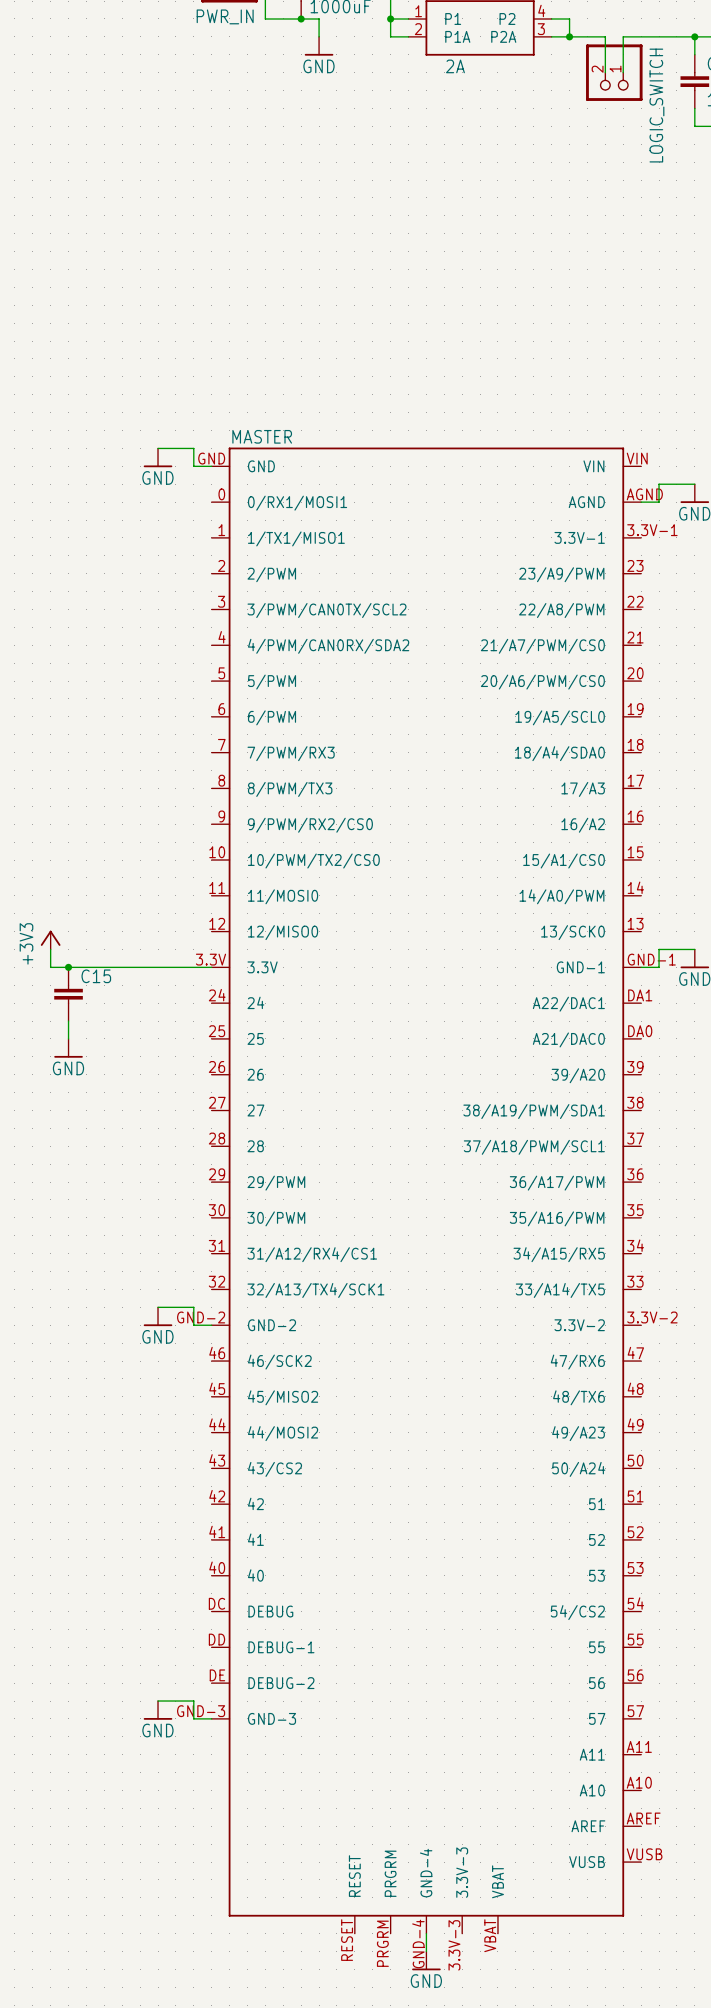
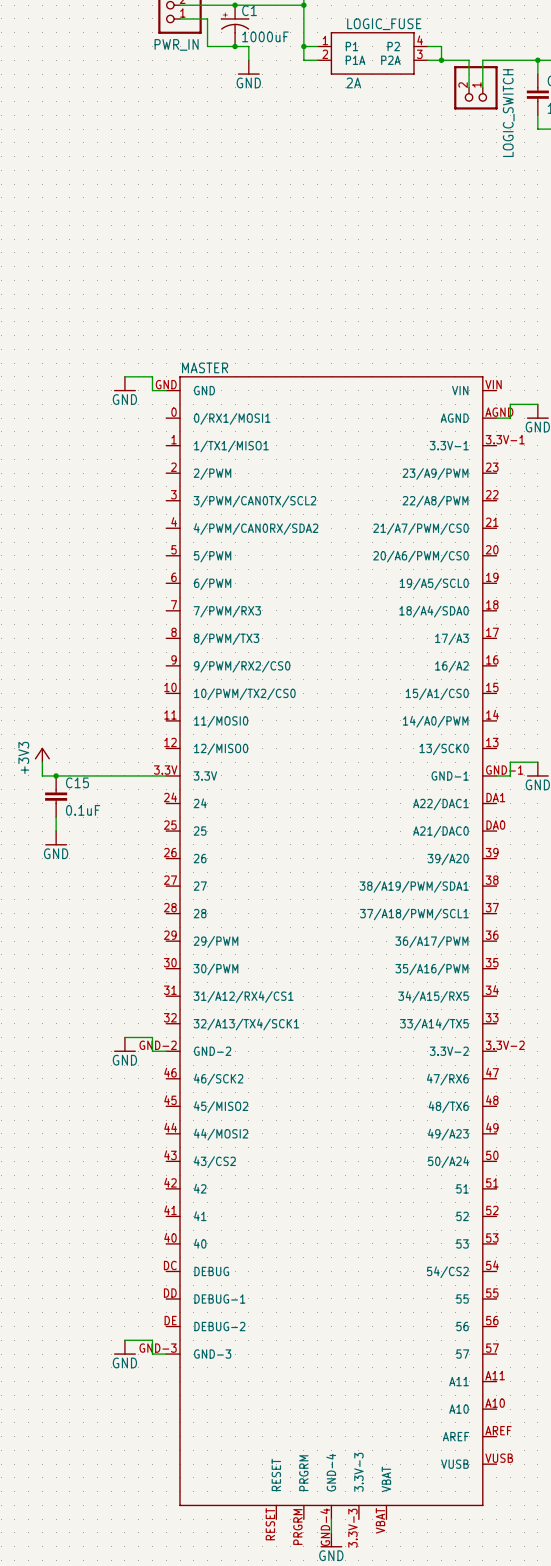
C15 value: none -> 0.1uF (83, 810)

